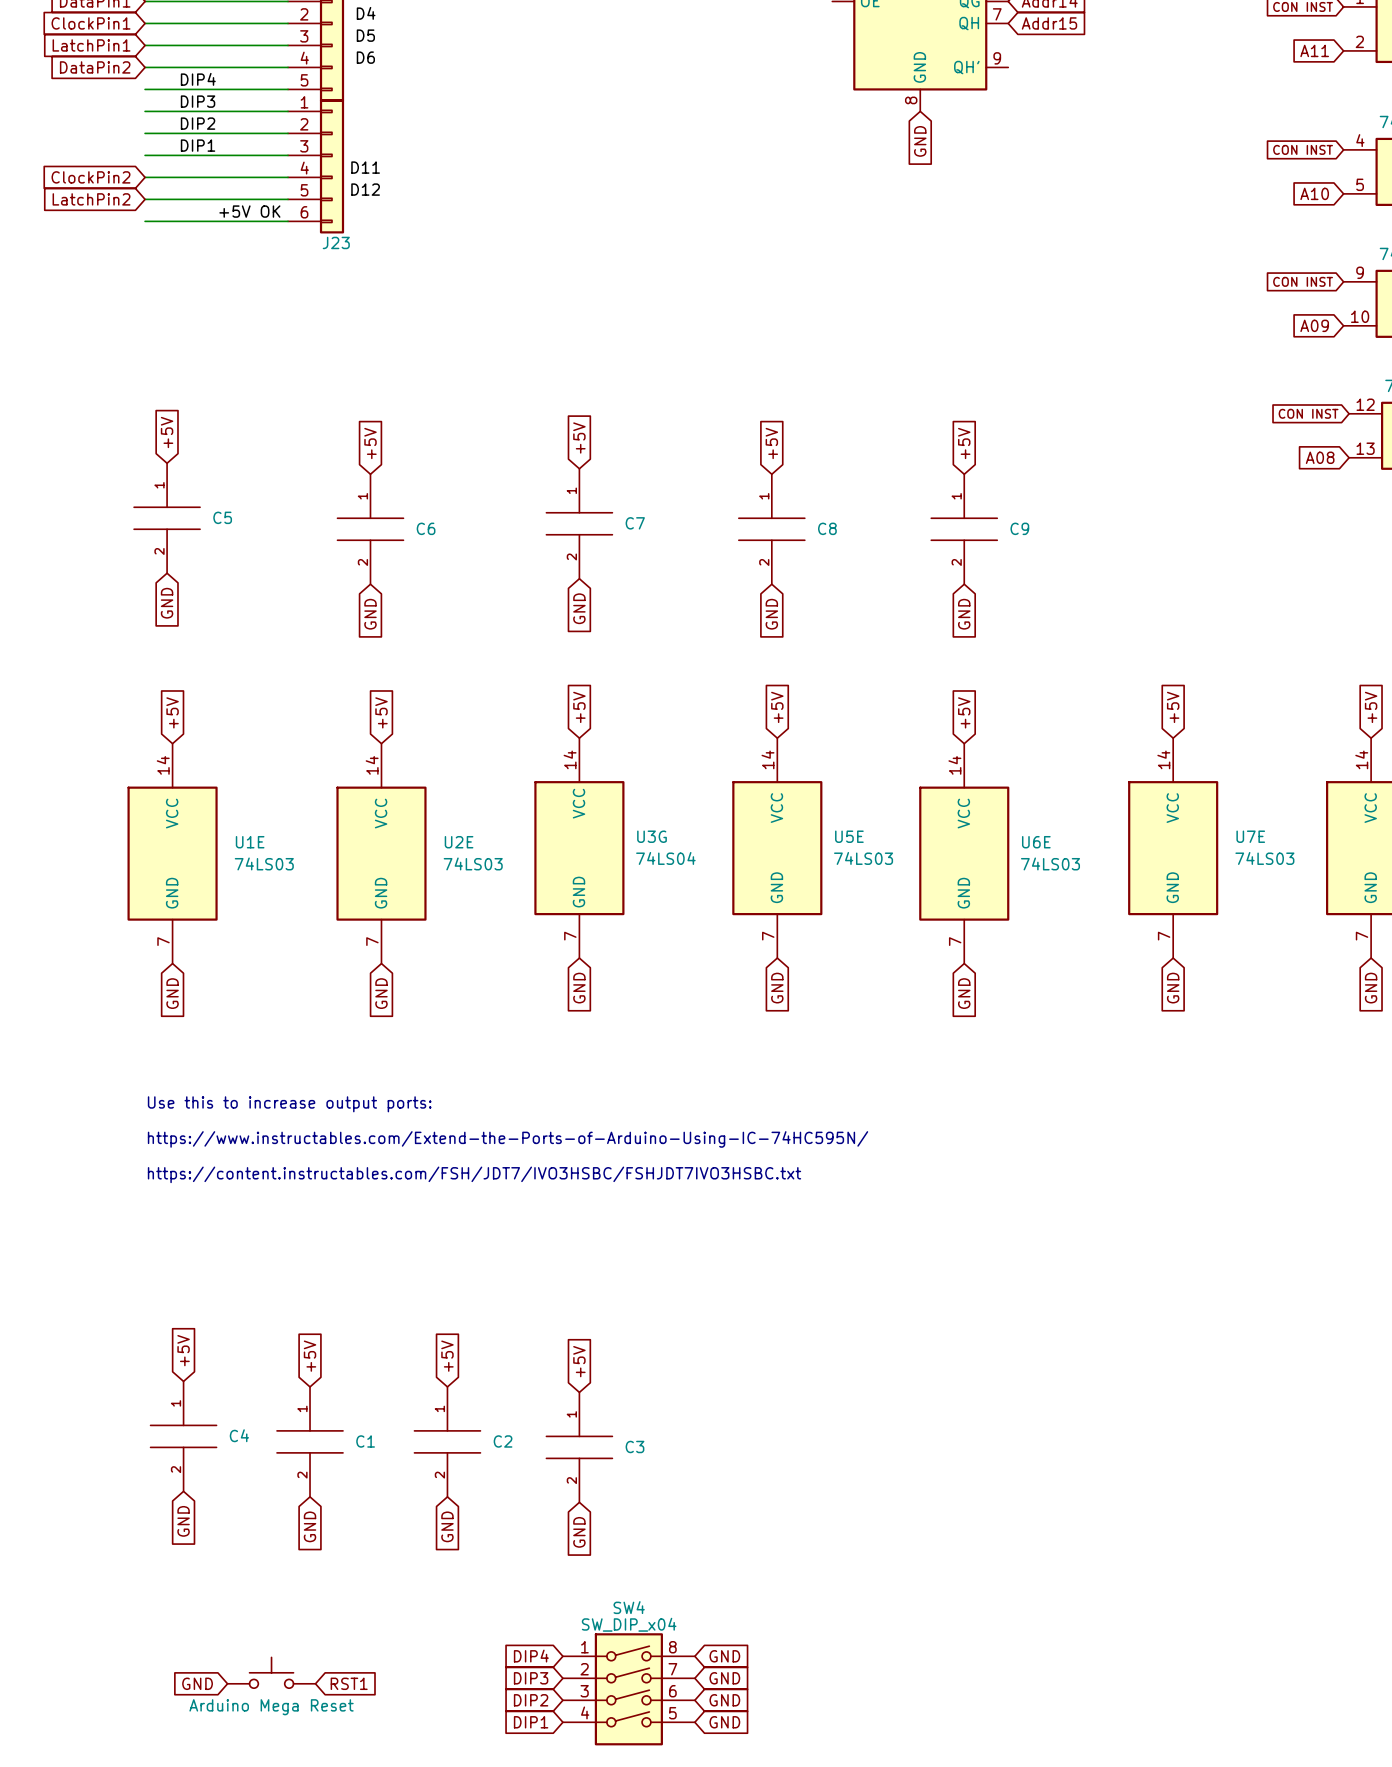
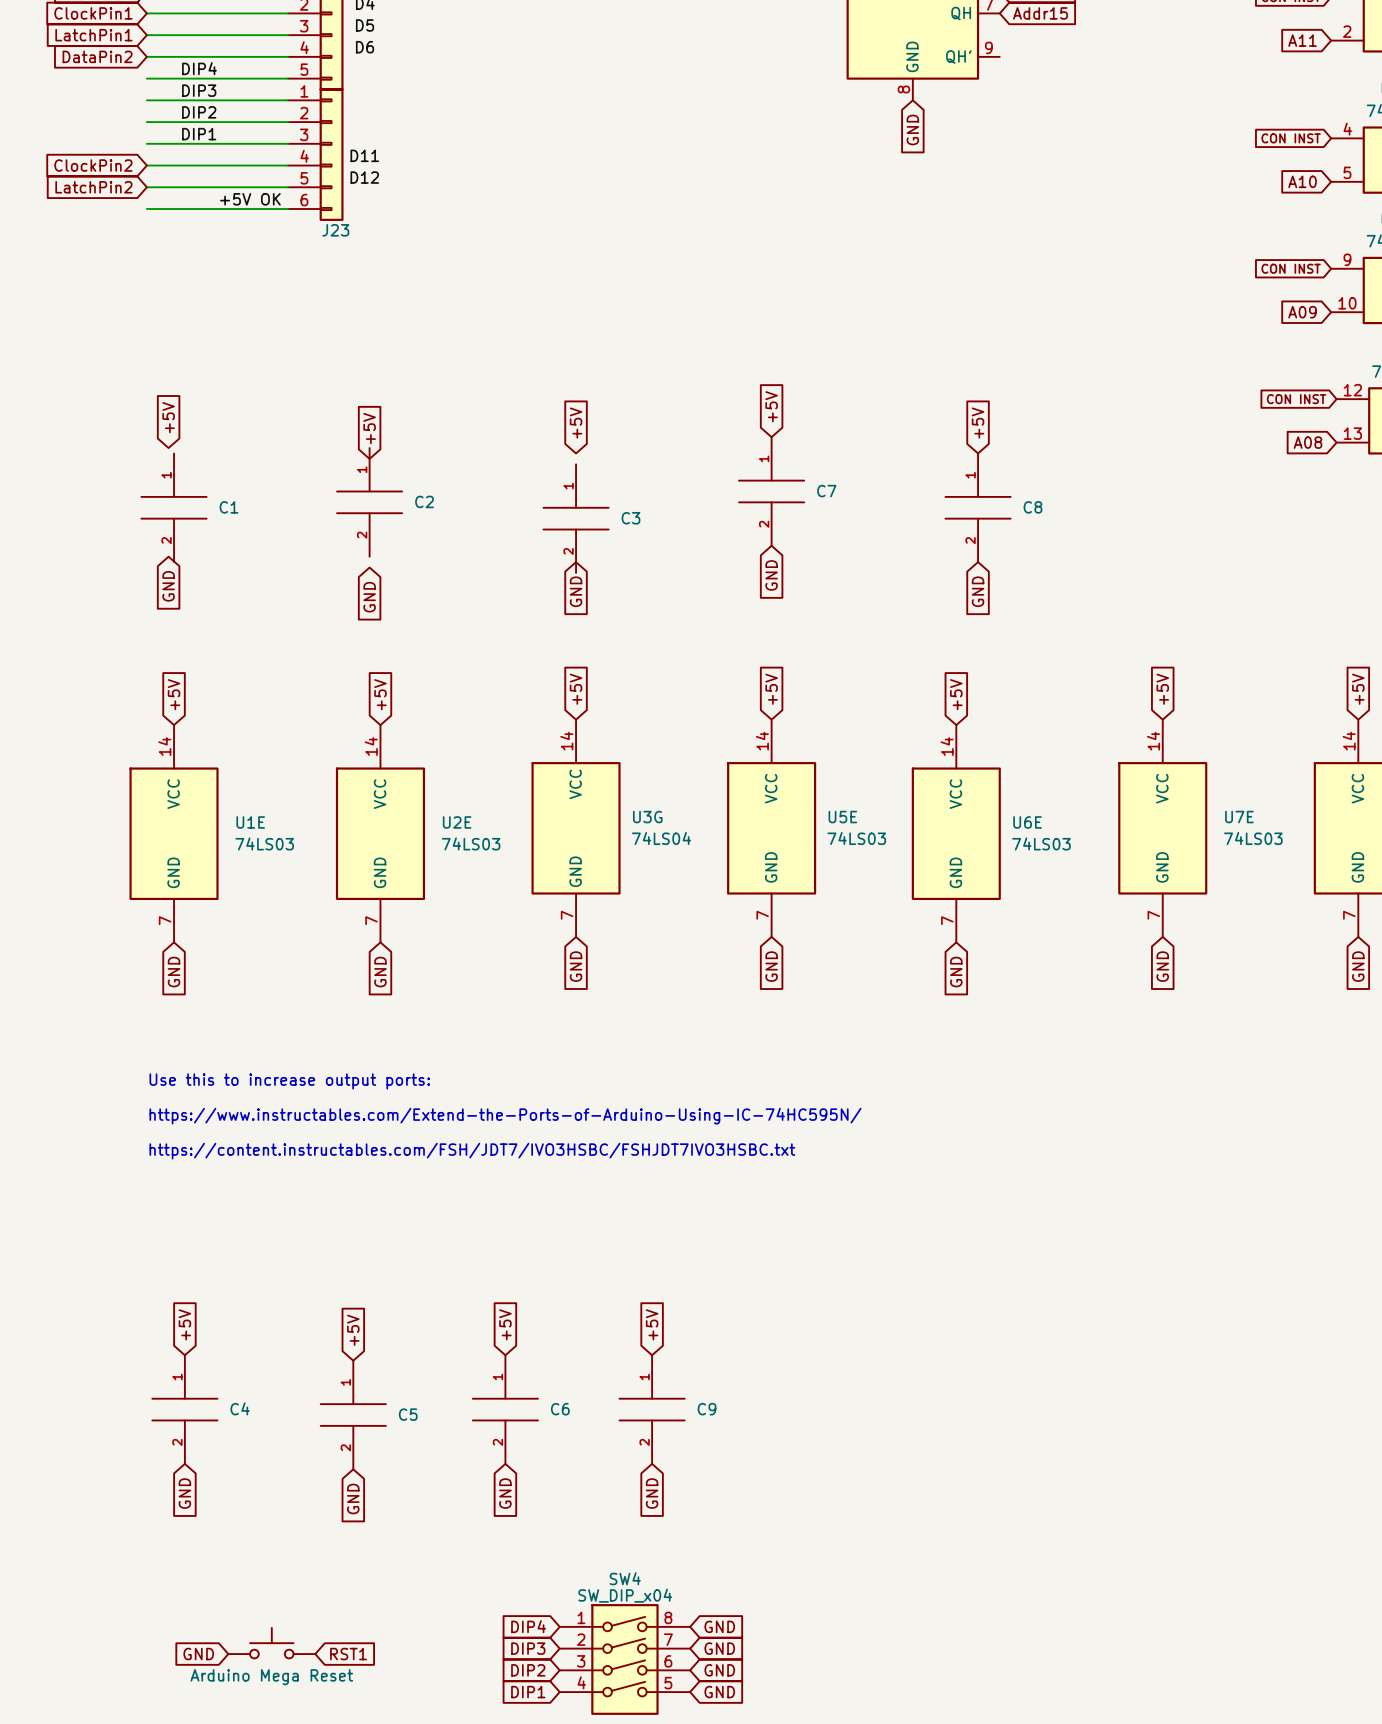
global label position: +5V (771, 443) -> +5V (771, 406)
global label position: +5V (964, 443) -> +5V (978, 423)
C5 position: (167, 518) -> (353, 1415)
C7 position: (579, 523) -> (771, 491)
C6 position: (370, 529) -> (505, 1409)
C8 position: (771, 529) -> (978, 507)
C9 position: (964, 529) -> (652, 1409)
global label position: GND (771, 614) -> GND (771, 575)
global label position: GND (964, 614) -> GND (978, 591)
global label: none -> +5V (505, 1324)
global label: none -> +5V (652, 1324)
global label position: +5V (310, 1356) -> +5V (353, 1330)
global label: +5V (447, 1356) -> none
global label: +5V (579, 1361) -> none
C1 position: (310, 1441) -> (174, 507)
C2 position: (447, 1441) -> (369, 502)
C3 position: (579, 1447) -> (576, 518)
global label: none -> GND (505, 1493)
global label: none -> GND (652, 1493)
global label position: GND (310, 1526) -> GND (353, 1498)
global label: GND (447, 1526) -> none
global label: GND (579, 1532) -> none

